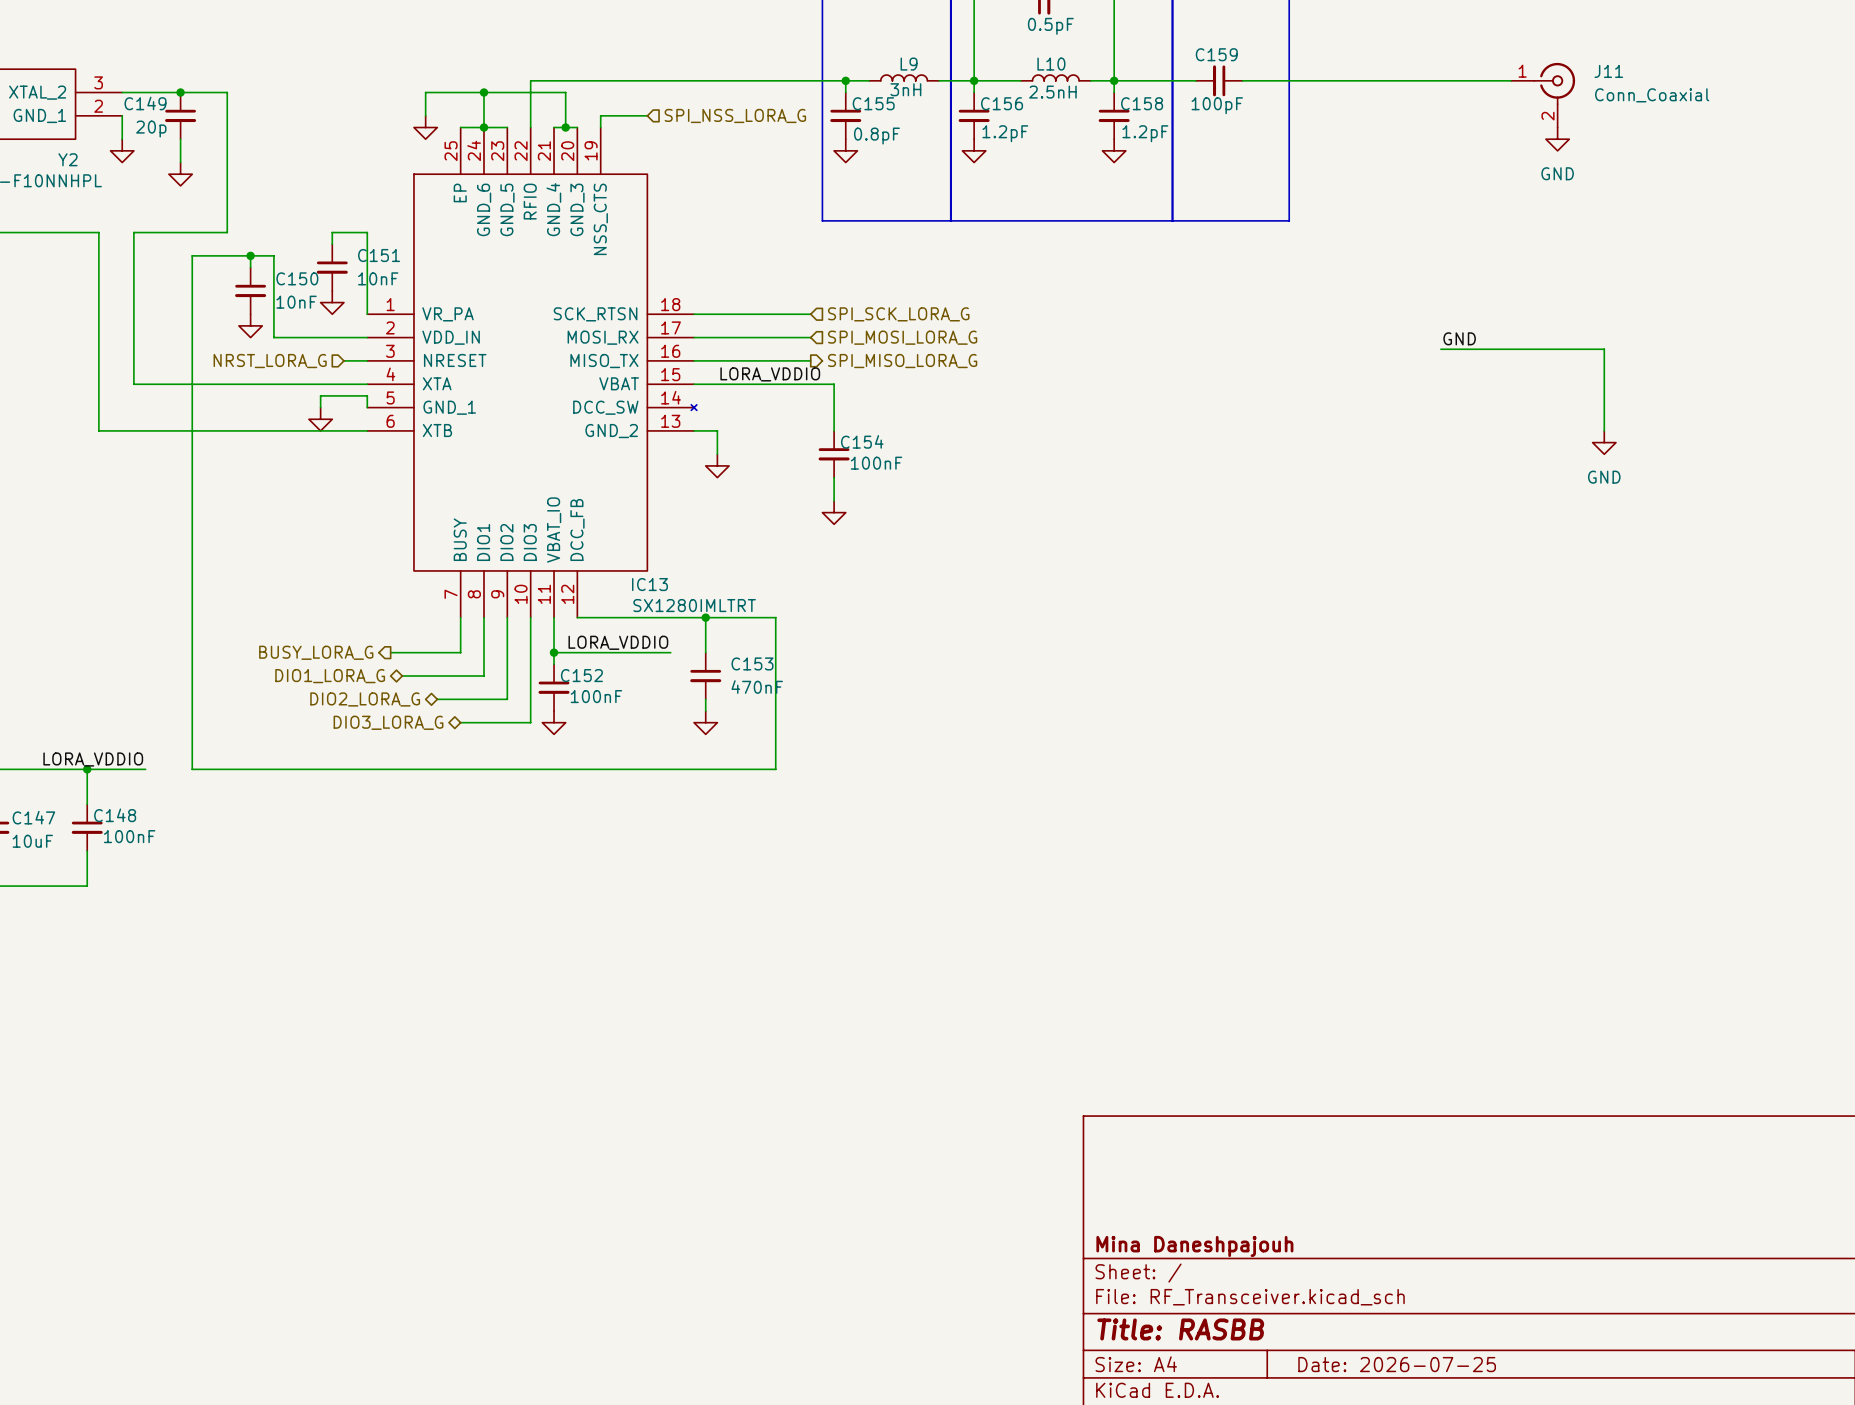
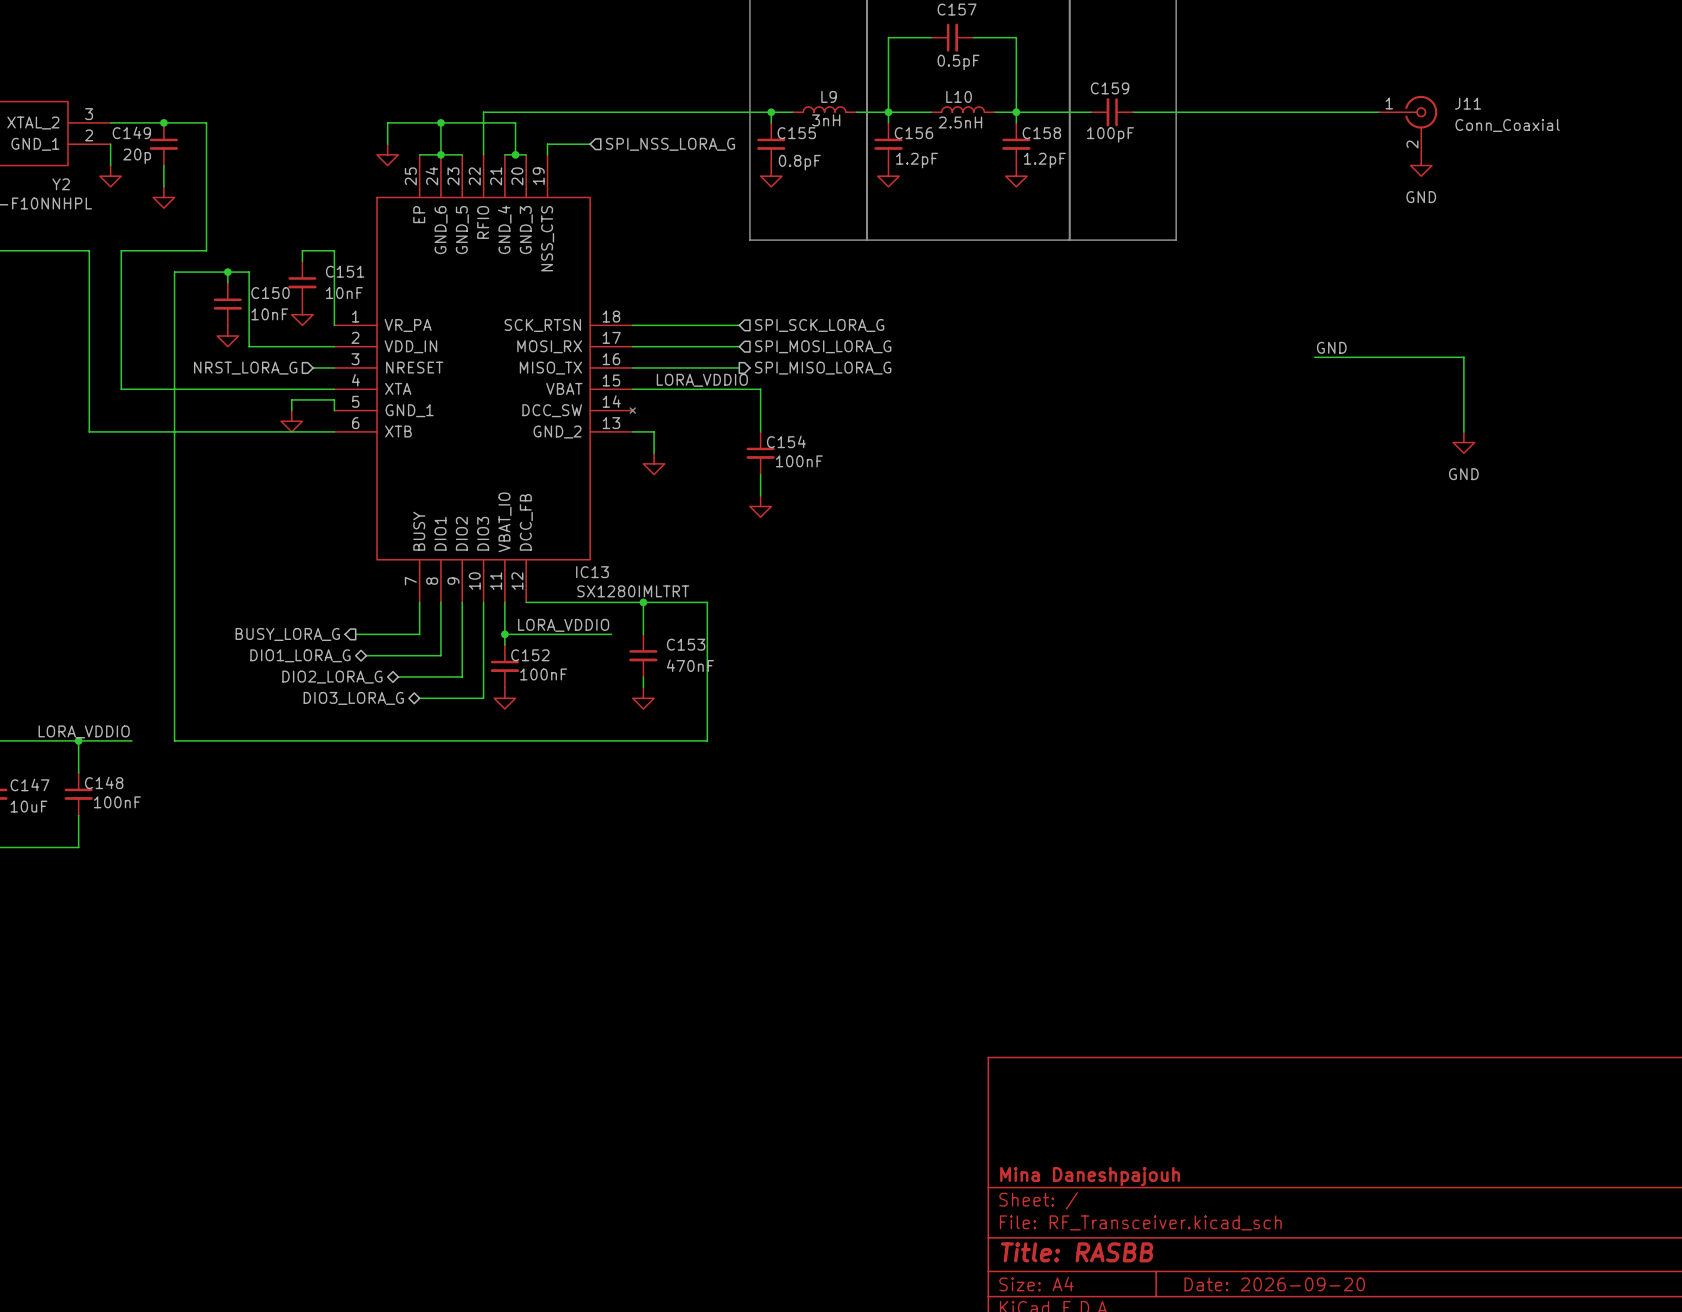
title block: Date: 2026-07-25 (1397, 1364) -> Date: 2026-09-20 (1274, 1284)

